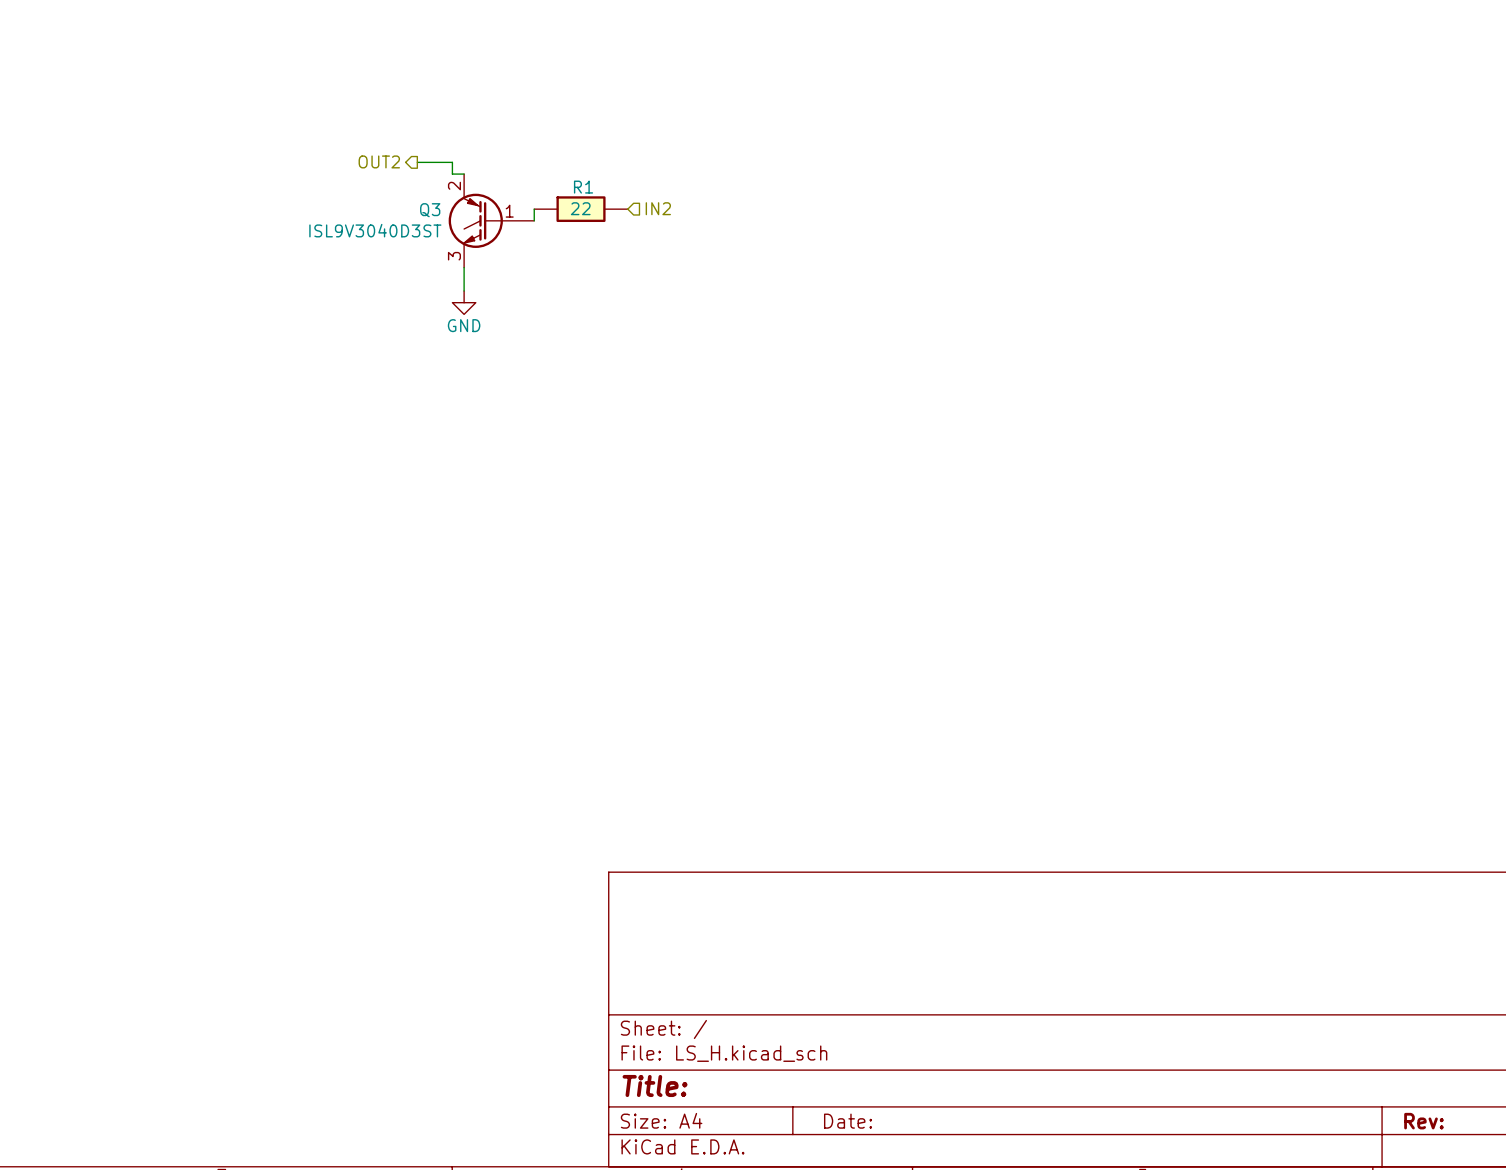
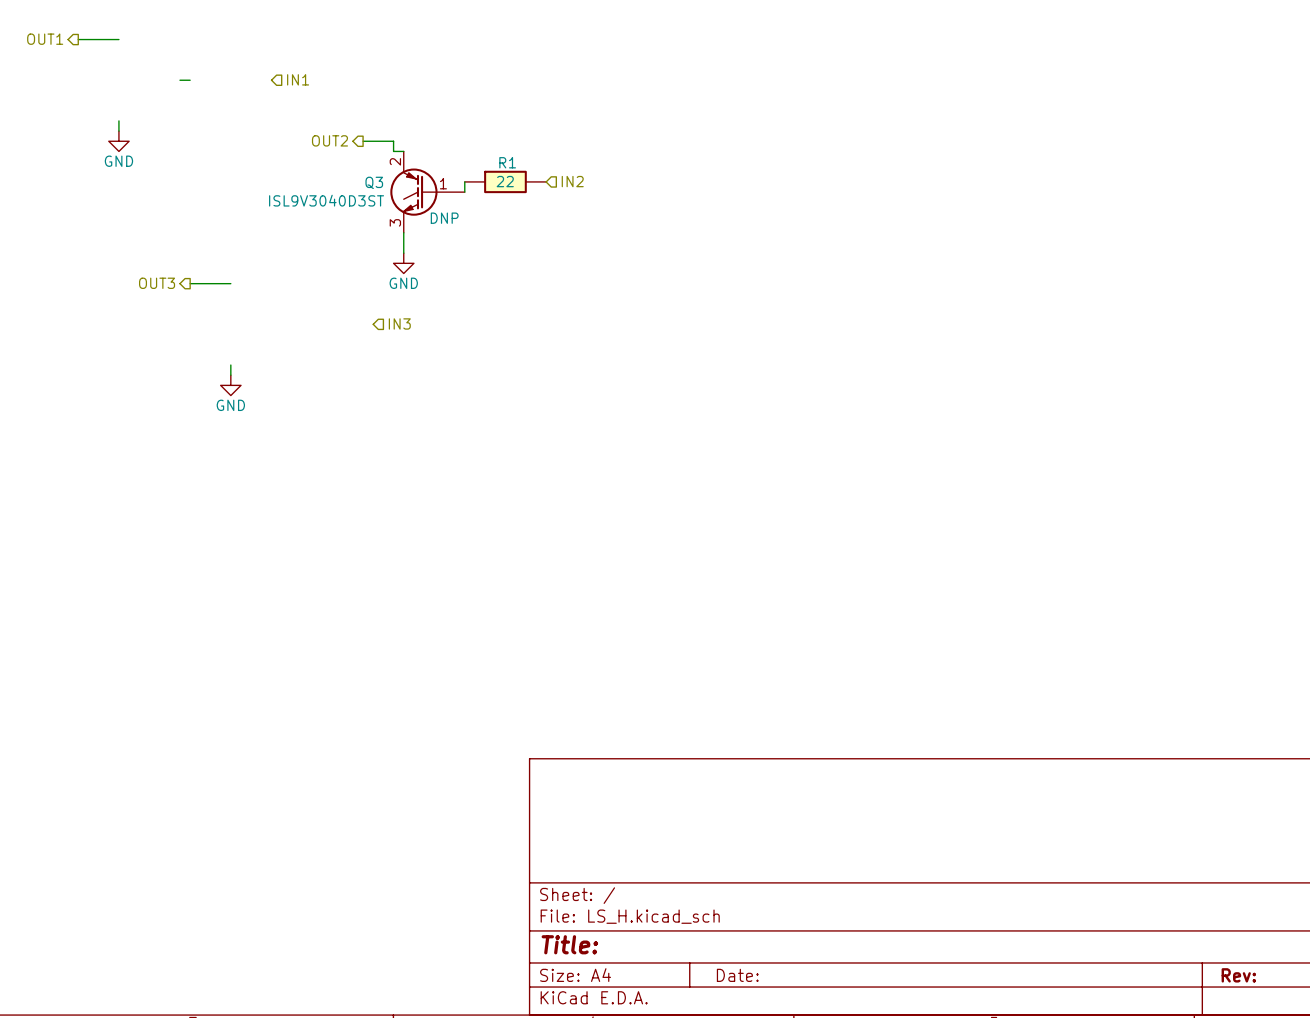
hierarchical label: none -> OUT1 (45, 39)
wire: none -> (78, 39) (118, 39)
hierarchical label: none -> IN1 (298, 79)
wire: none -> (179, 80) (190, 80)
wire: none -> (118, 120) (118, 131)
power symbol: none -> GND (118, 141)
Q3 text: none -> DNP (444, 218)
hierarchical label: none -> OUT3 (157, 283)
wire: none -> (190, 283) (230, 283)
hierarchical label: none -> IN3 (399, 323)
wire: none -> (230, 365) (230, 375)
power symbol: none -> GND (230, 385)

